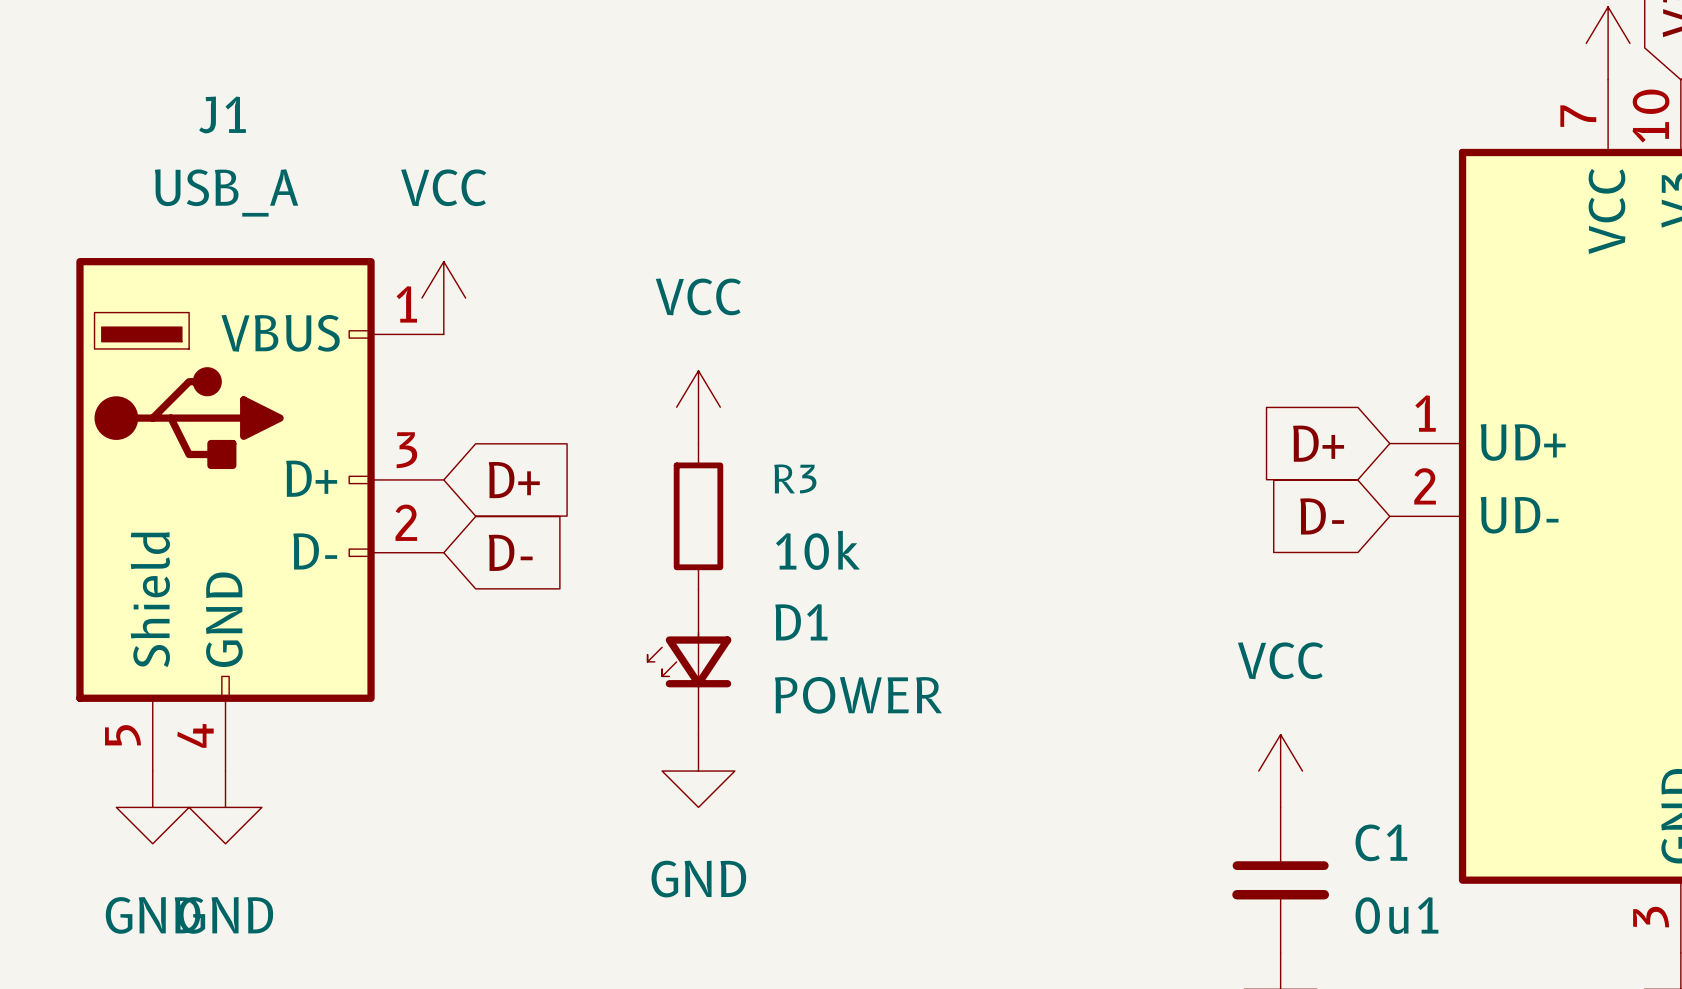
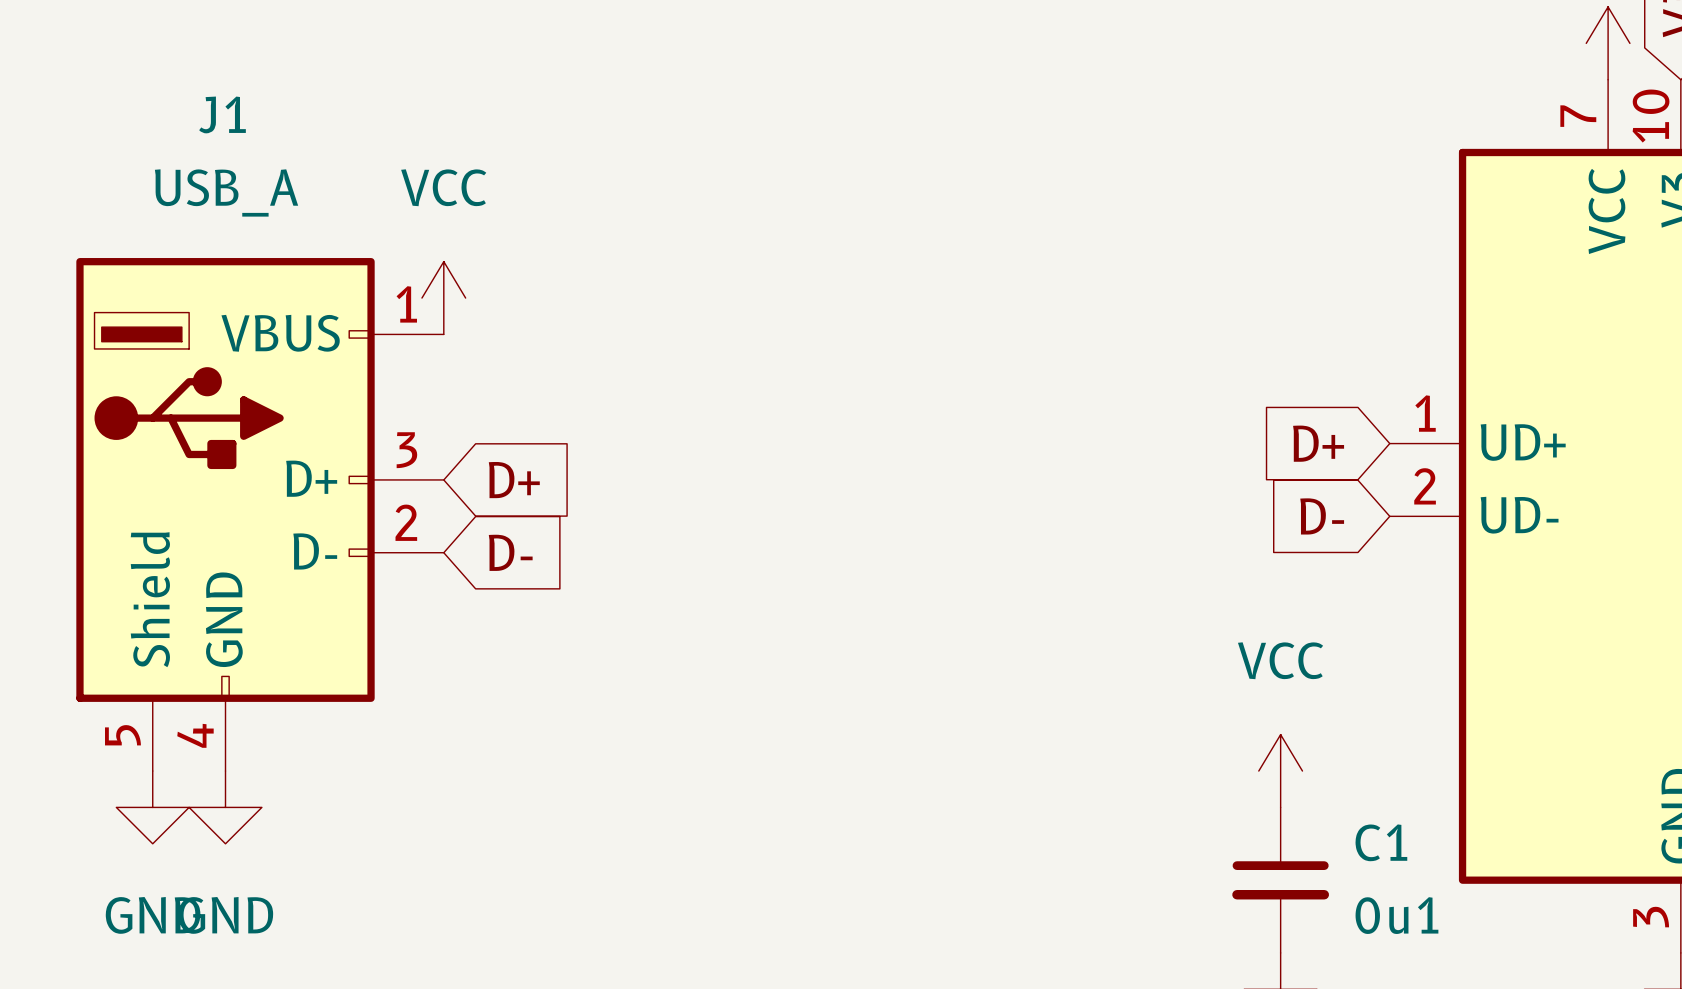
power symbol: VCC (698, 407) -> none
R3: 10k (698, 516) -> none
D1: POWER (689, 661) -> none
power symbol: GND (698, 771) -> none

